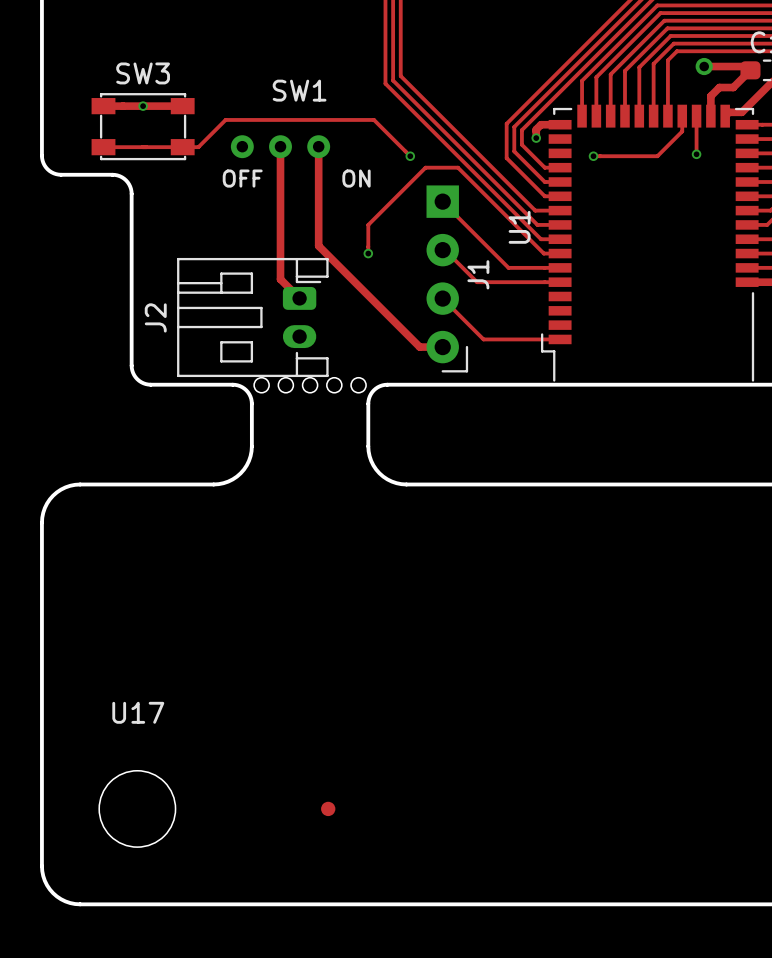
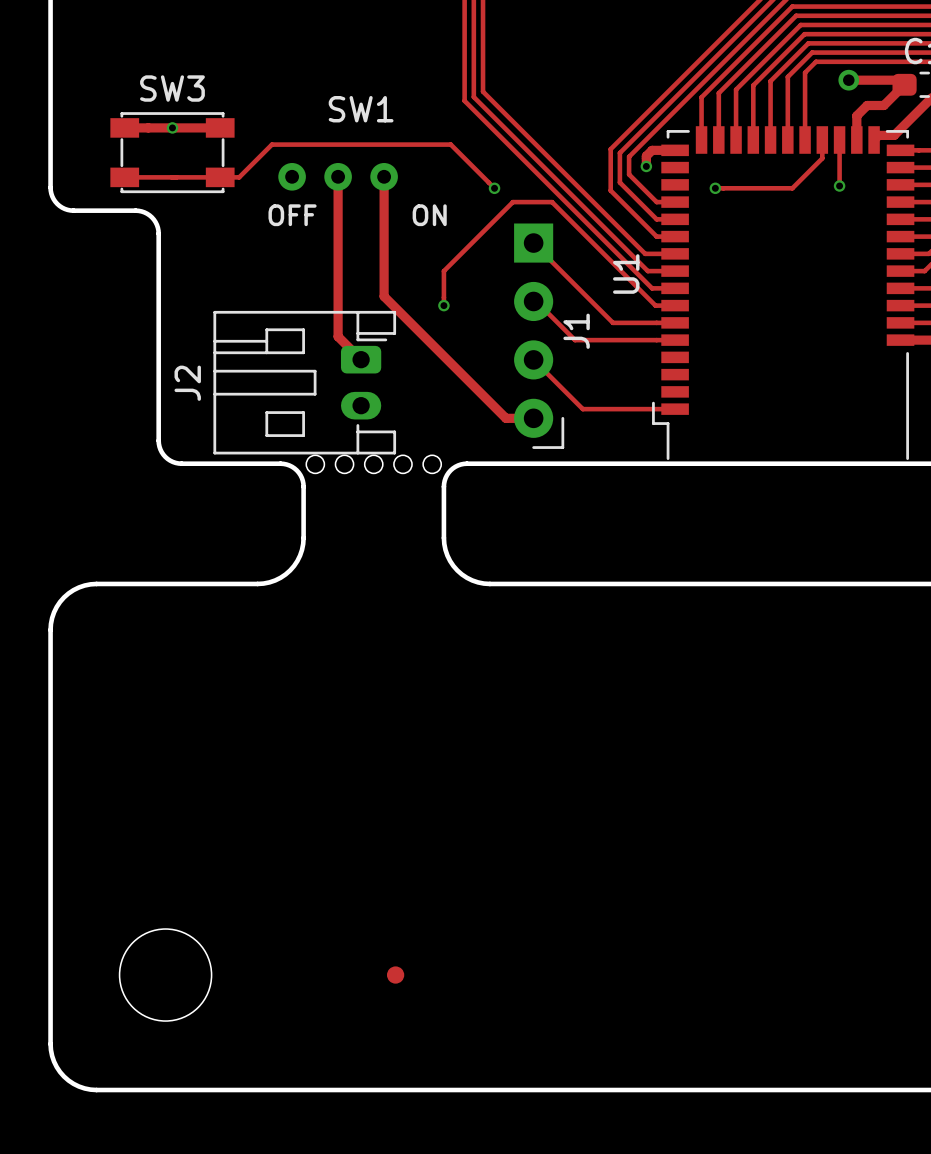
U17 name: U17 (138, 712) -> none

